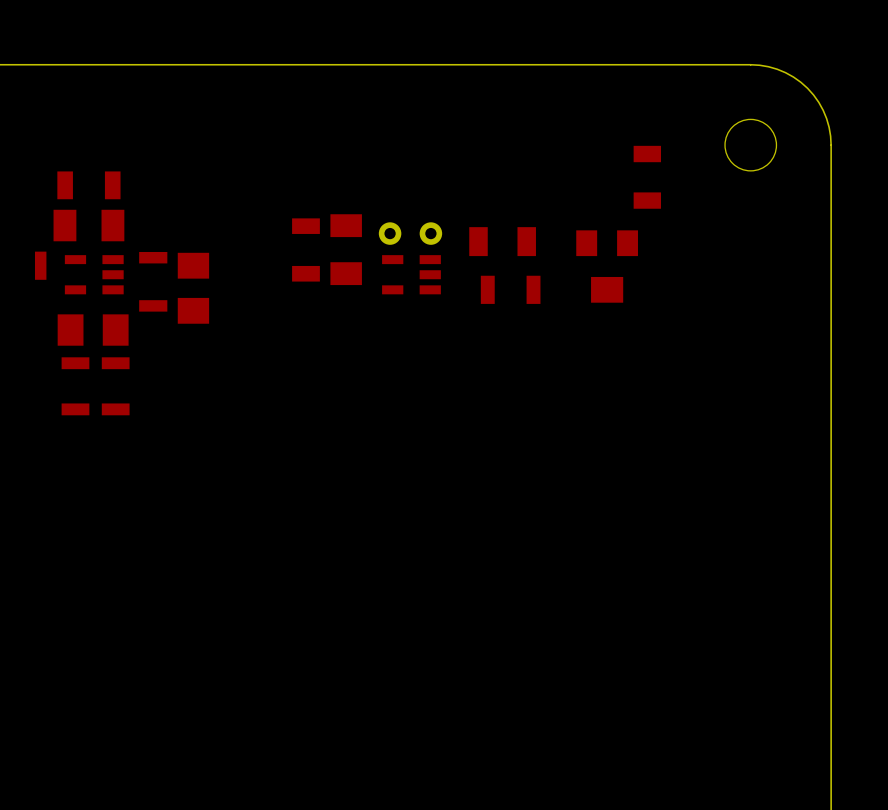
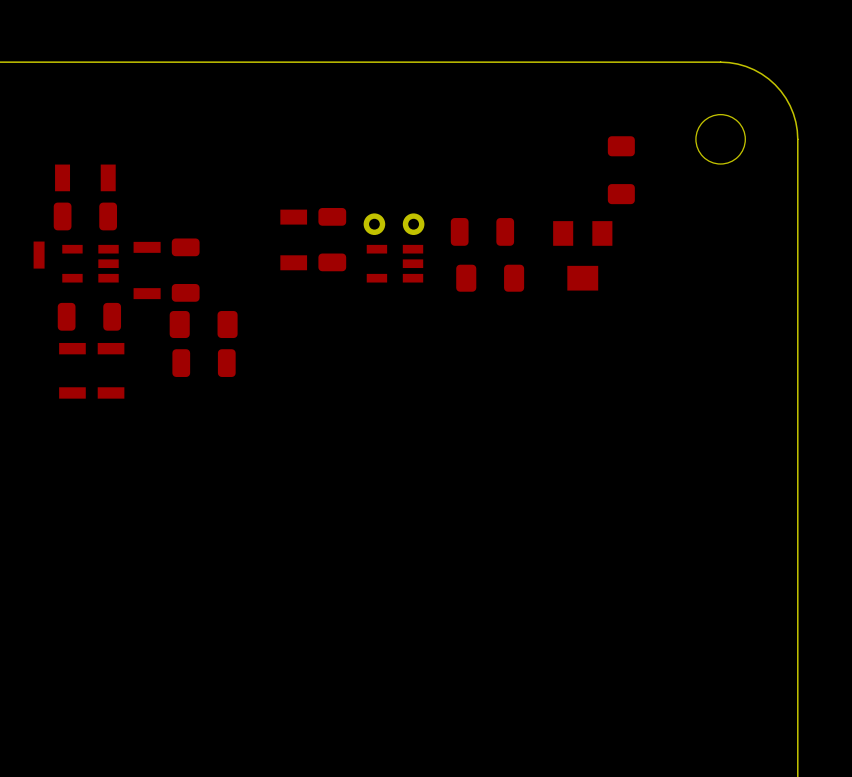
part footprint: [633, 145, 661, 209] -> [607, 136, 635, 205]
part footprint: [53, 209, 125, 242] -> [53, 202, 118, 231]
part footprint: [330, 214, 362, 286] -> [318, 207, 347, 272]
part footprint: [469, 227, 536, 257] -> [450, 218, 515, 246]
part footprint: [177, 252, 210, 324] -> [171, 238, 200, 302]
part footprint: [480, 275, 541, 304] -> [456, 264, 525, 292]
part footprint: [57, 314, 129, 346] -> [57, 302, 122, 331]
part: none -> (203, 324)
part: none -> (204, 363)

